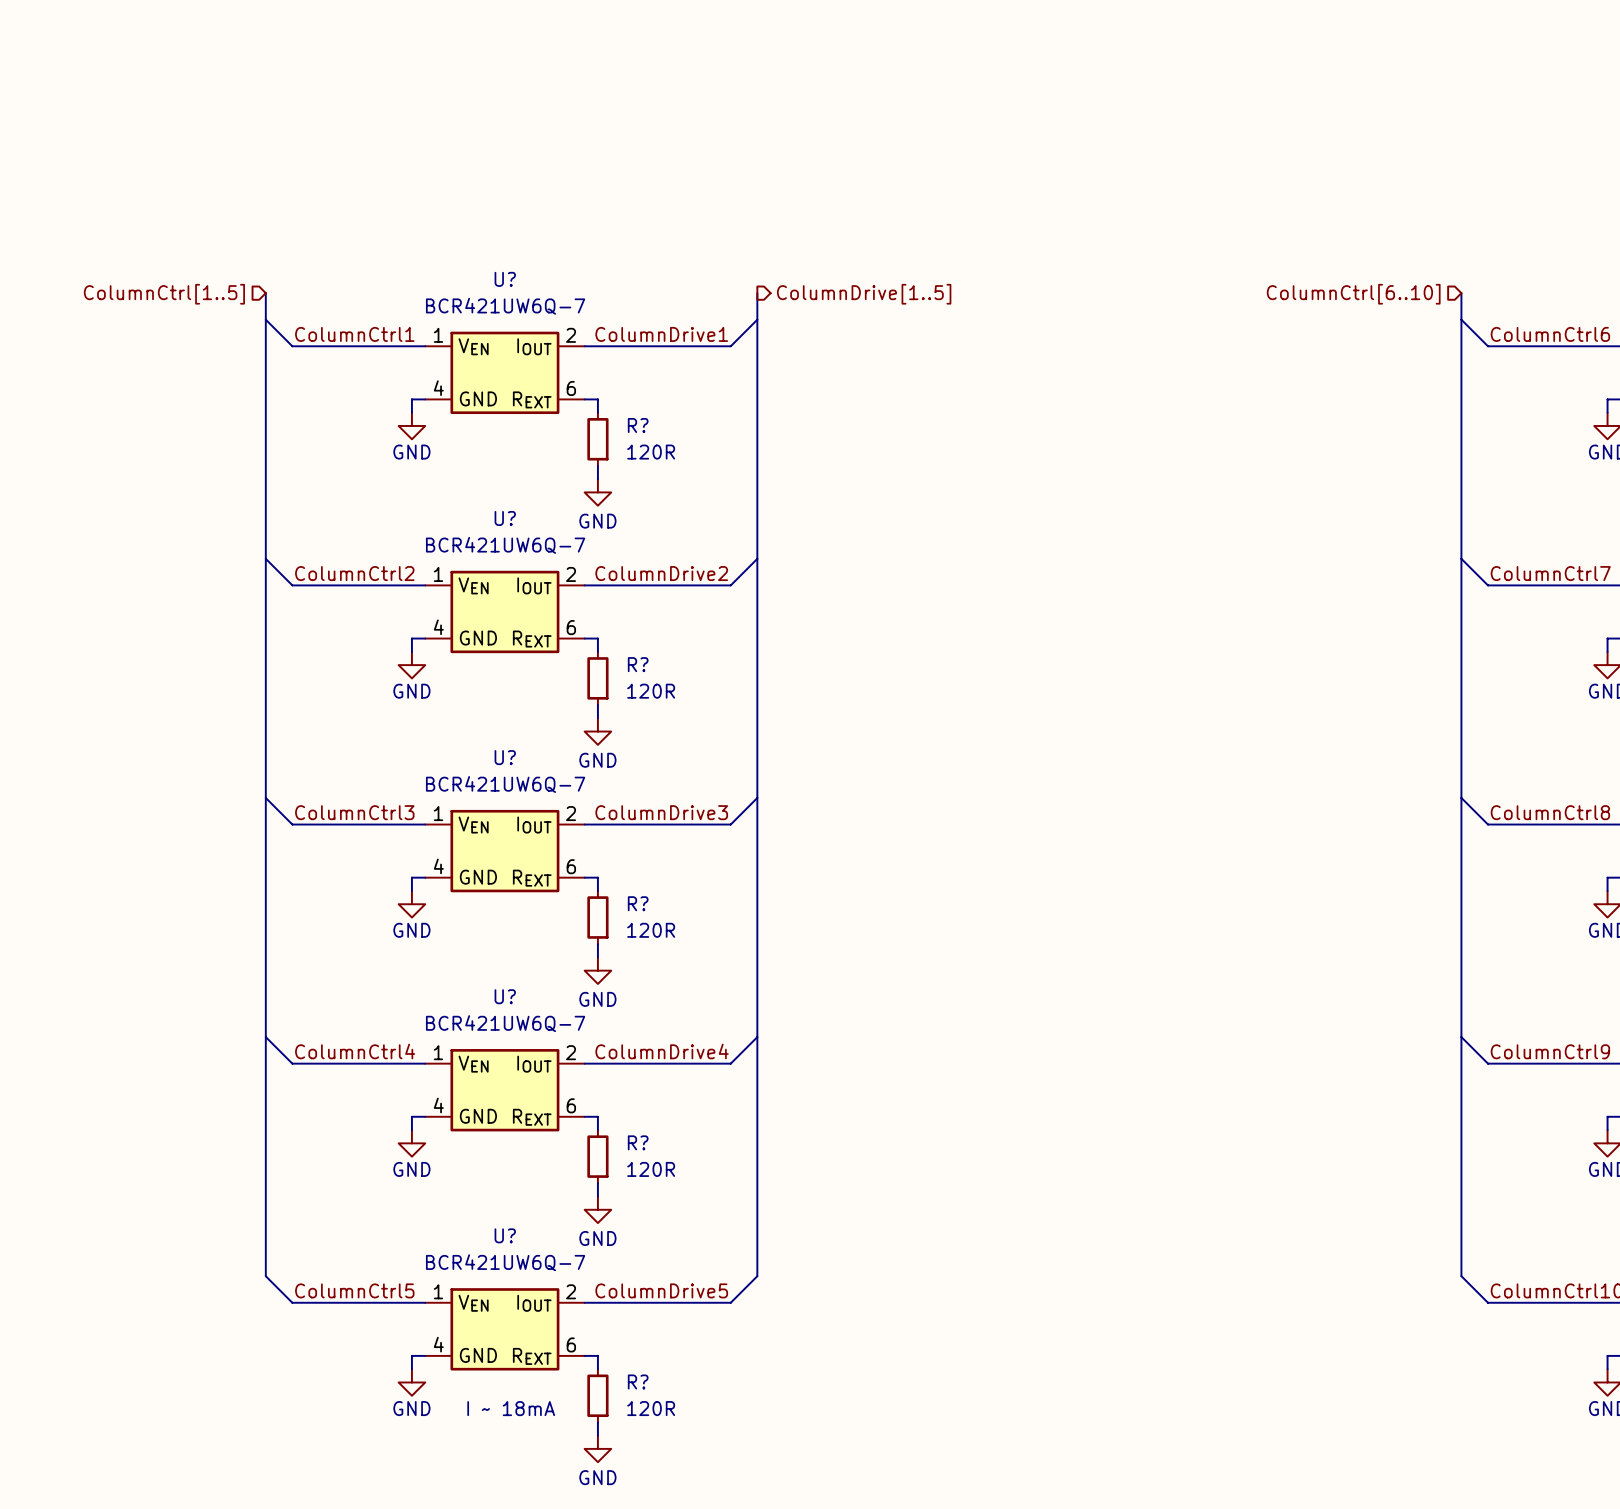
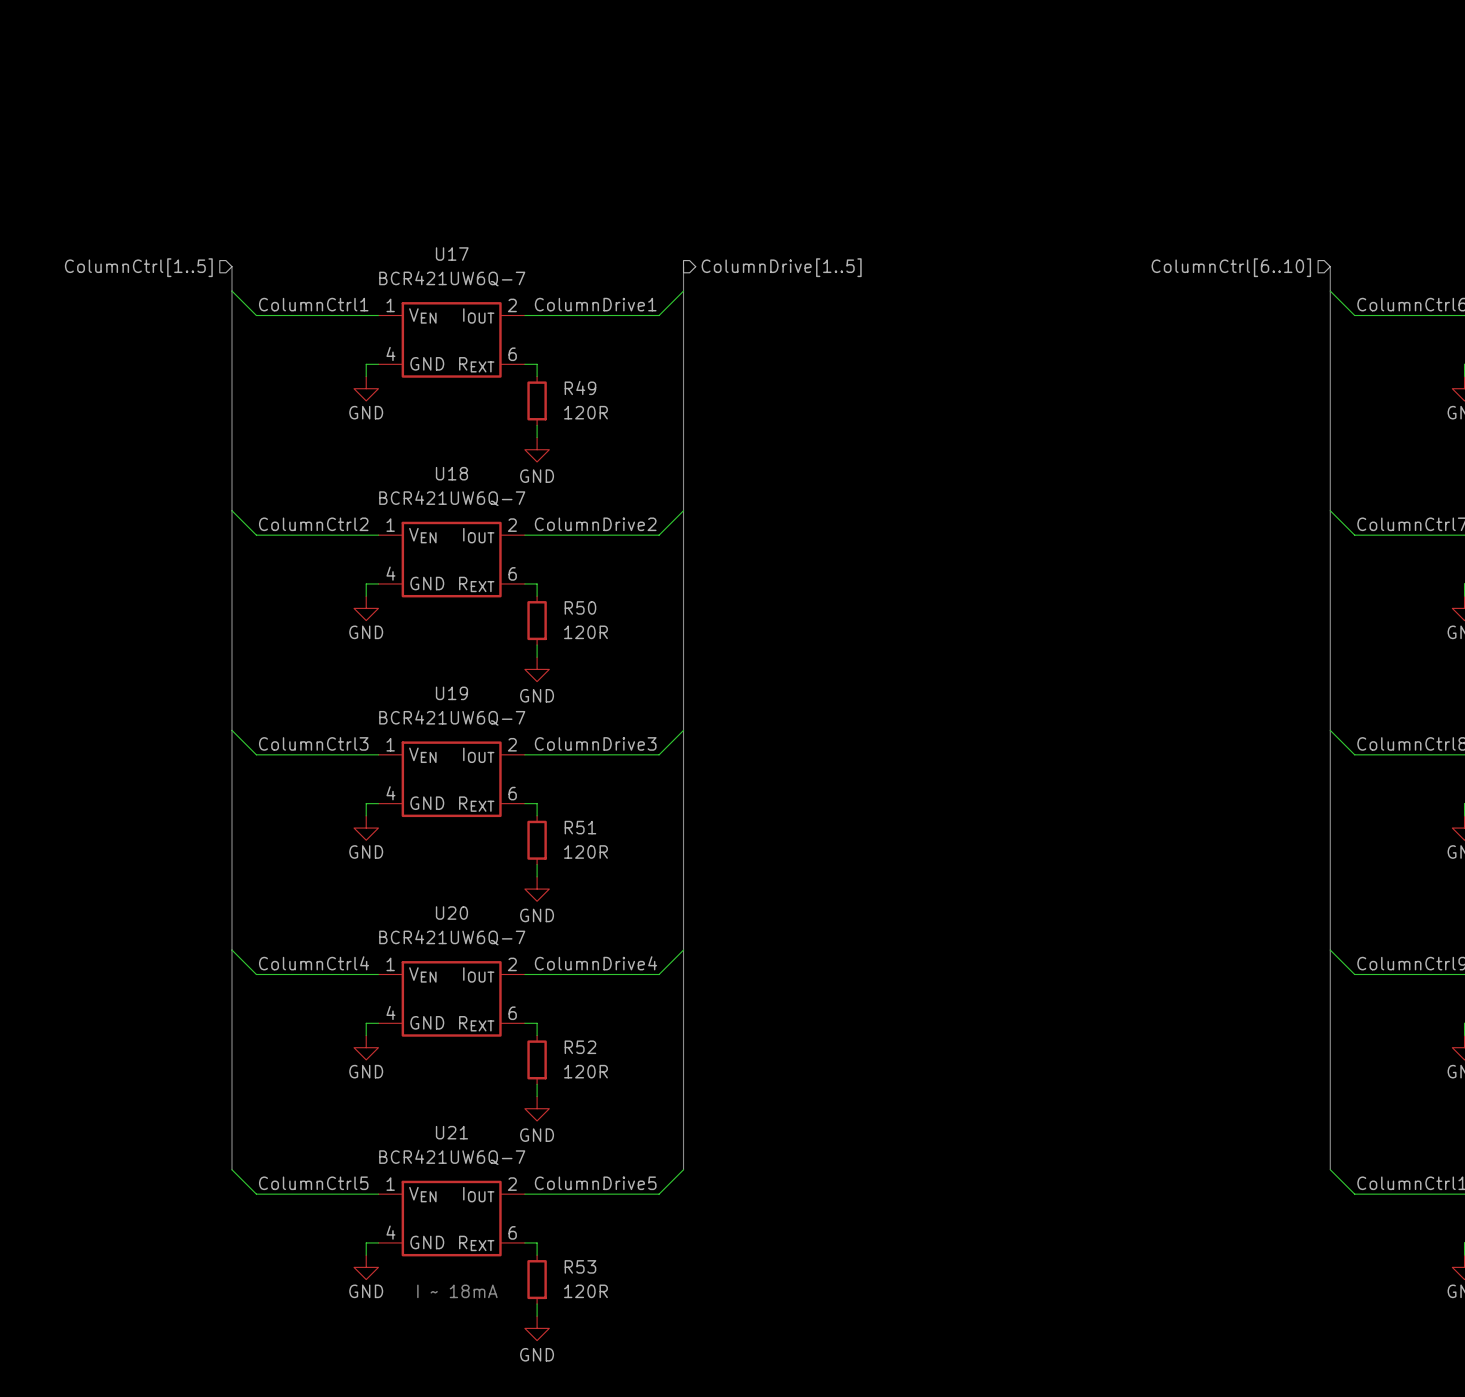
U? name: U? (505, 279) -> U17 (452, 254)
R? name: R? (638, 425) -> R49 (580, 387)
U? name: U? (505, 518) -> U18 (451, 473)
R? name: R? (638, 664) -> R50 (580, 607)
U? name: U? (505, 757) -> U19 (451, 693)
R? name: R? (638, 903) -> R51 (580, 827)
U? name: U? (505, 996) -> U20 (451, 913)
R? name: R? (638, 1142) -> R52 (580, 1047)
U? name: U? (505, 1235) -> U21 (451, 1132)
R? name: R? (638, 1381) -> R53 (580, 1266)

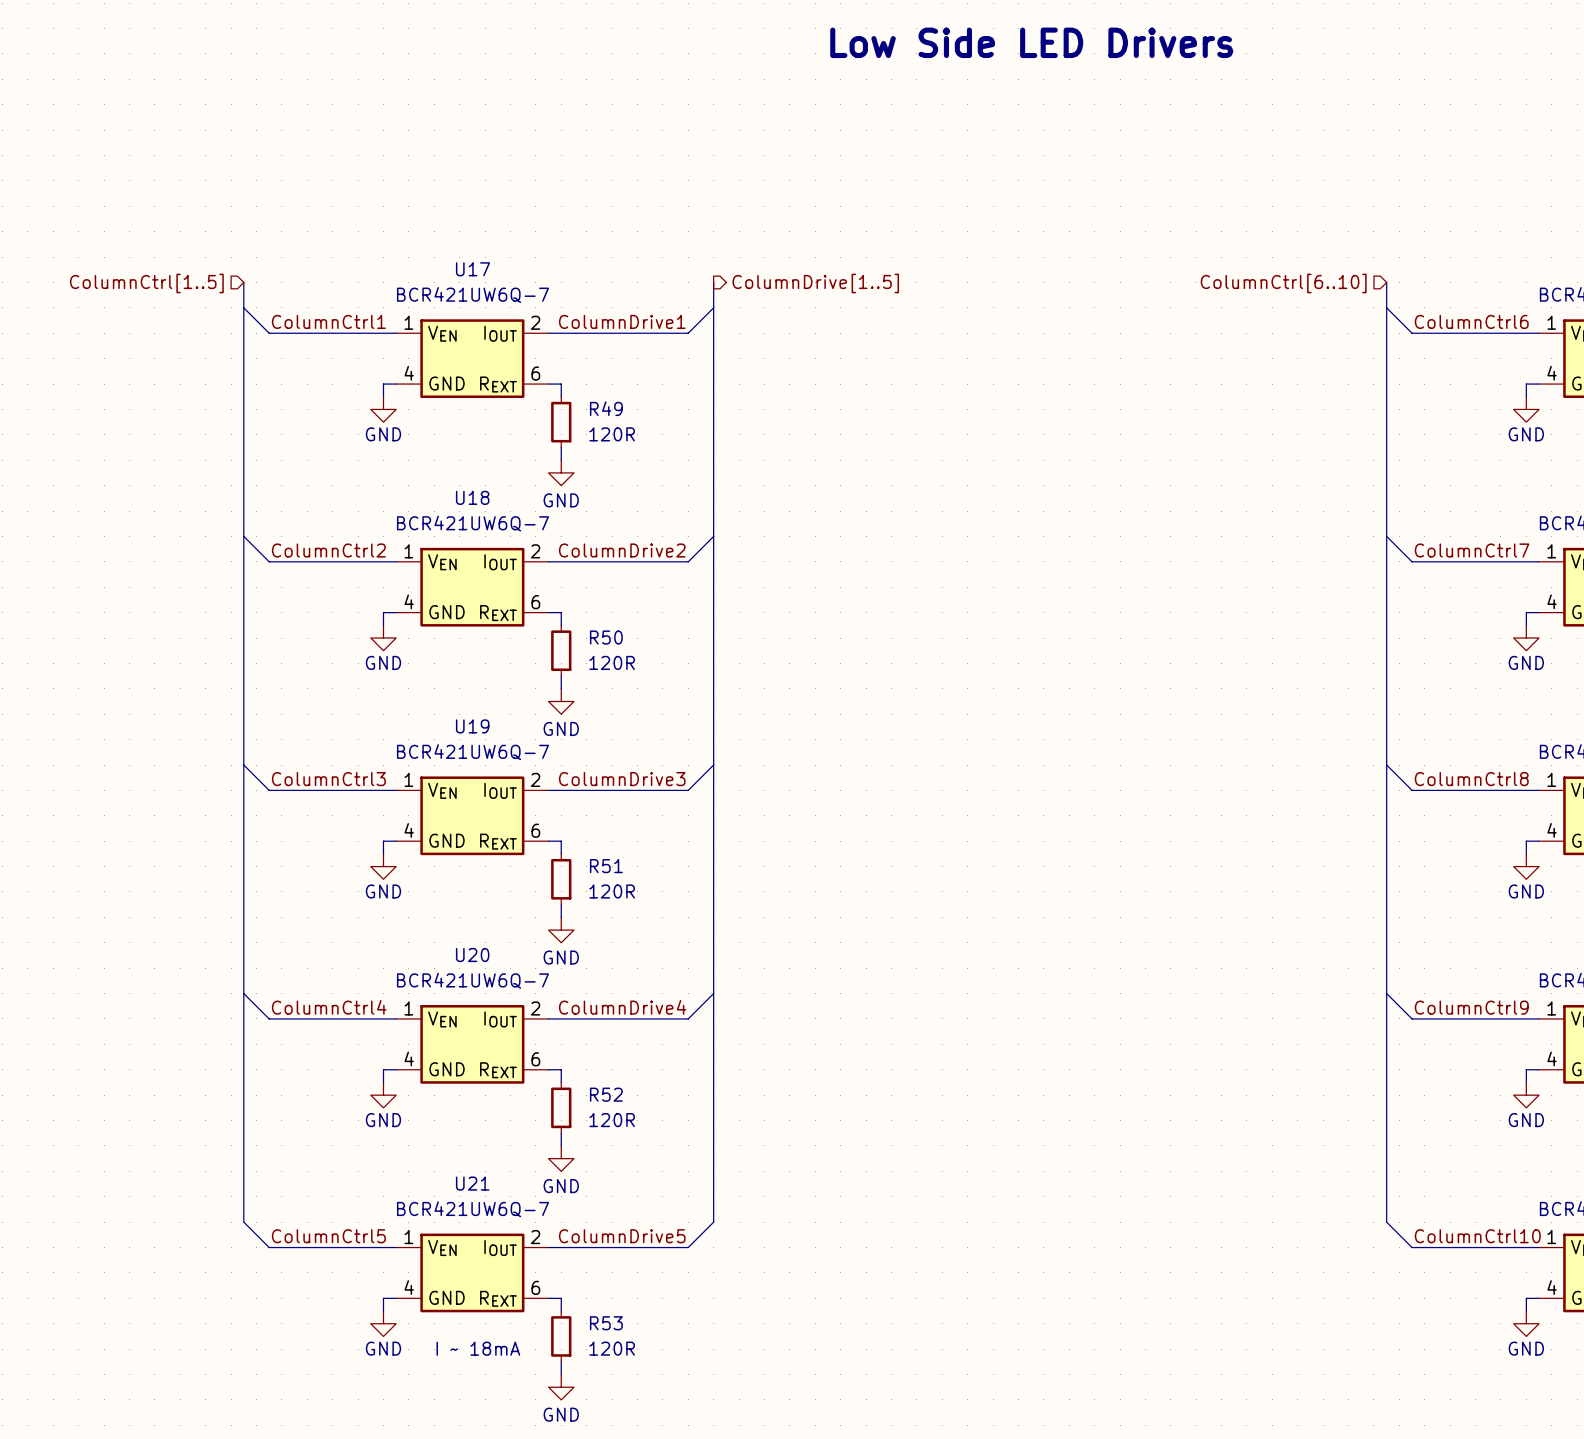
text: none -> Low Side LED Drivers (1031, 42)

